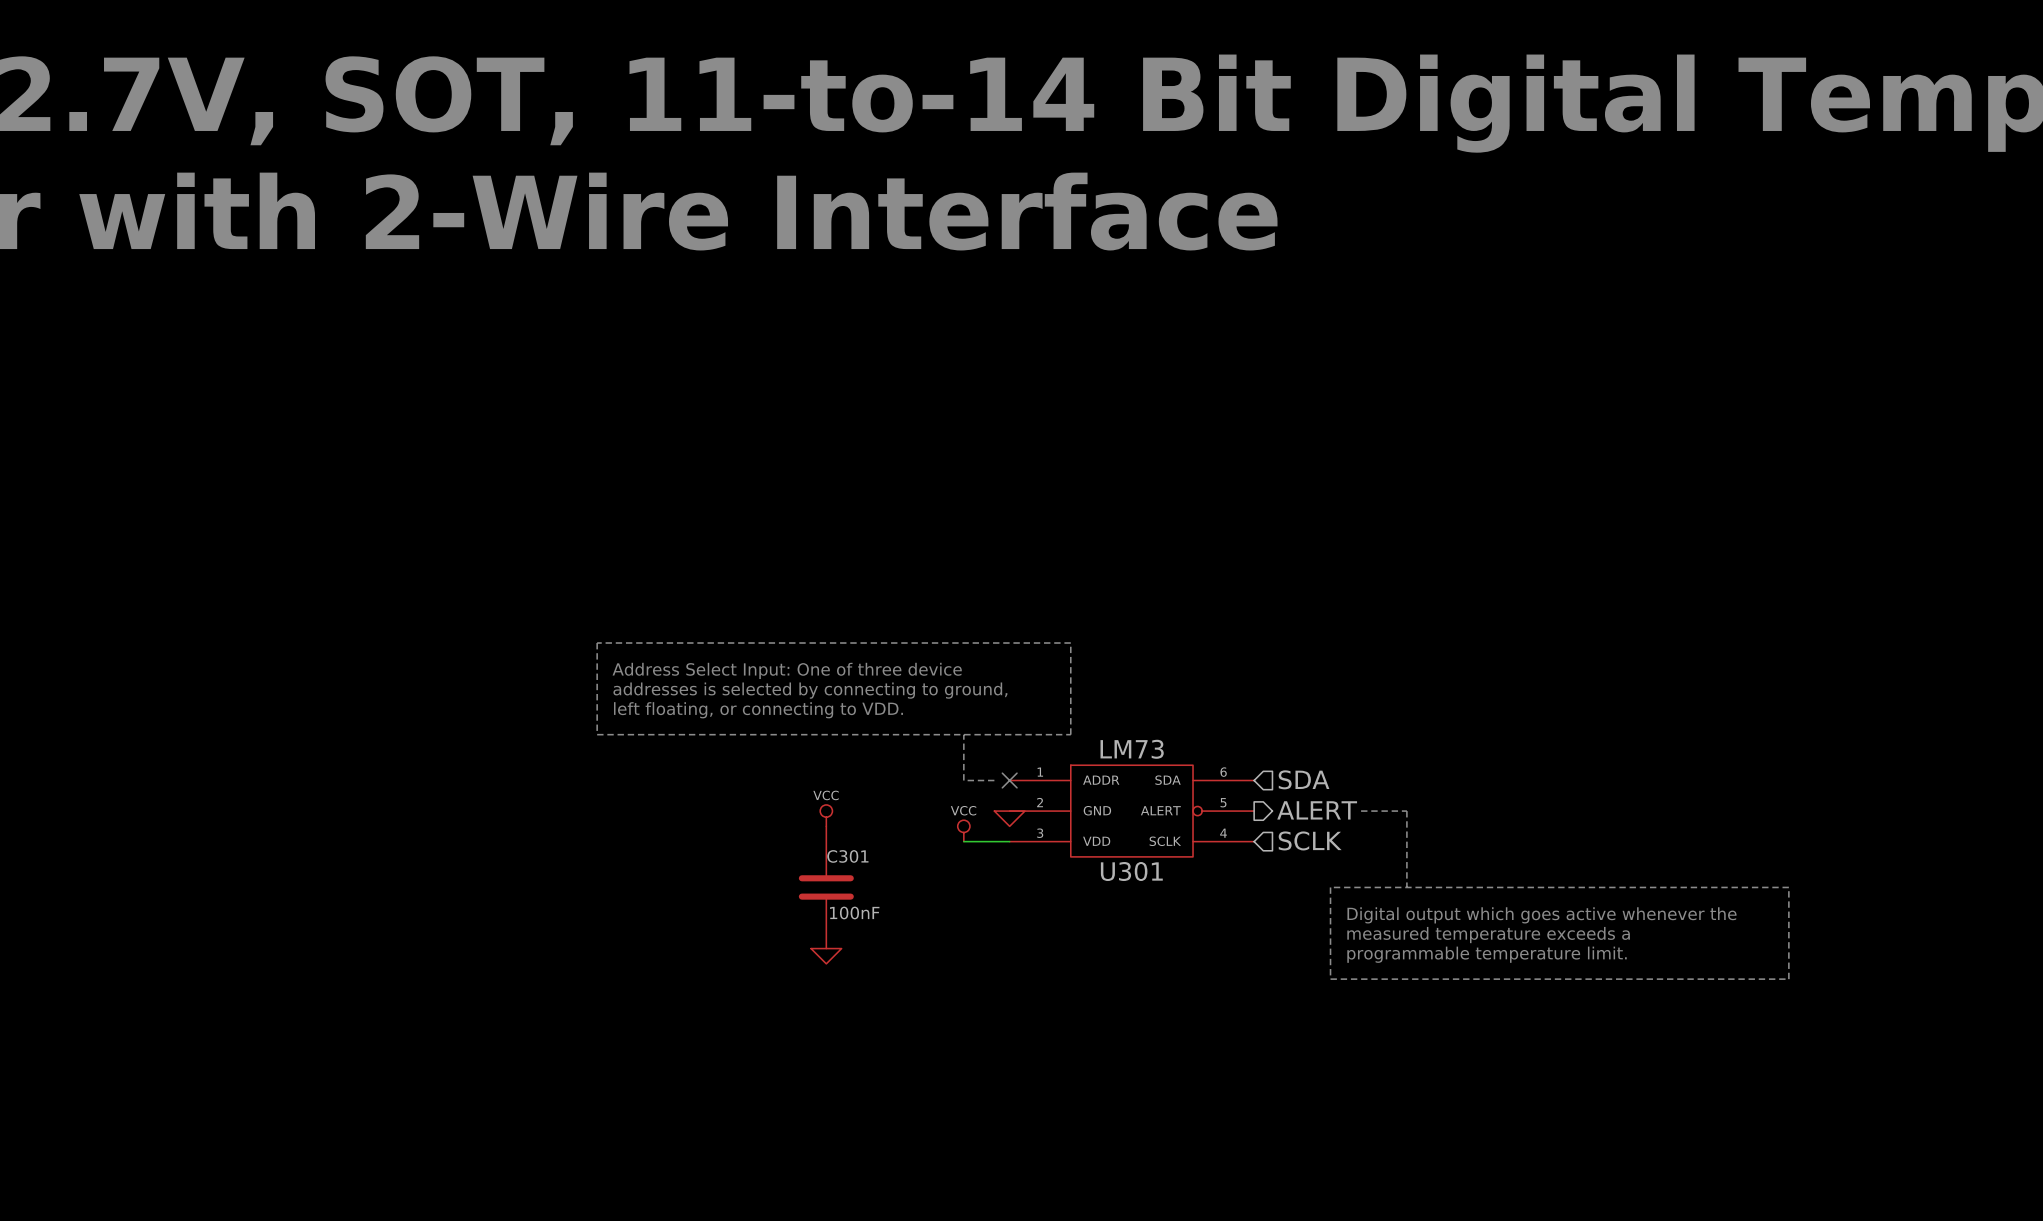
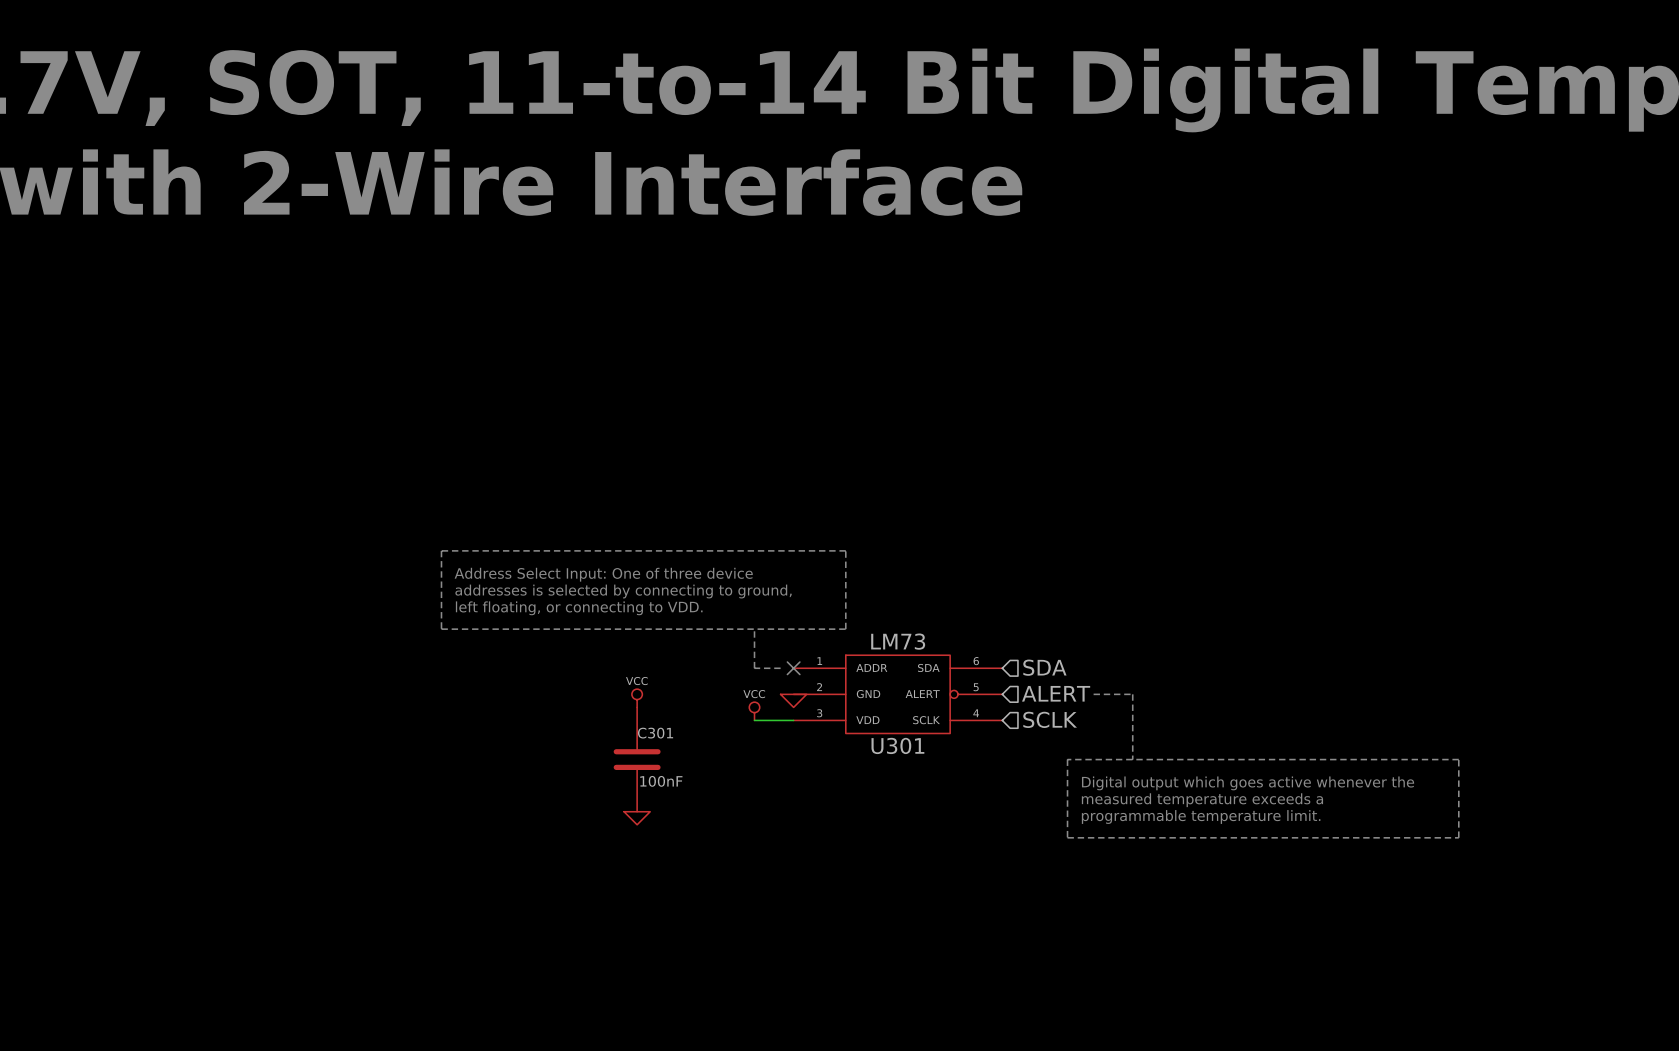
hierarchical label shape: output (1317, 810) -> input (1056, 693)

